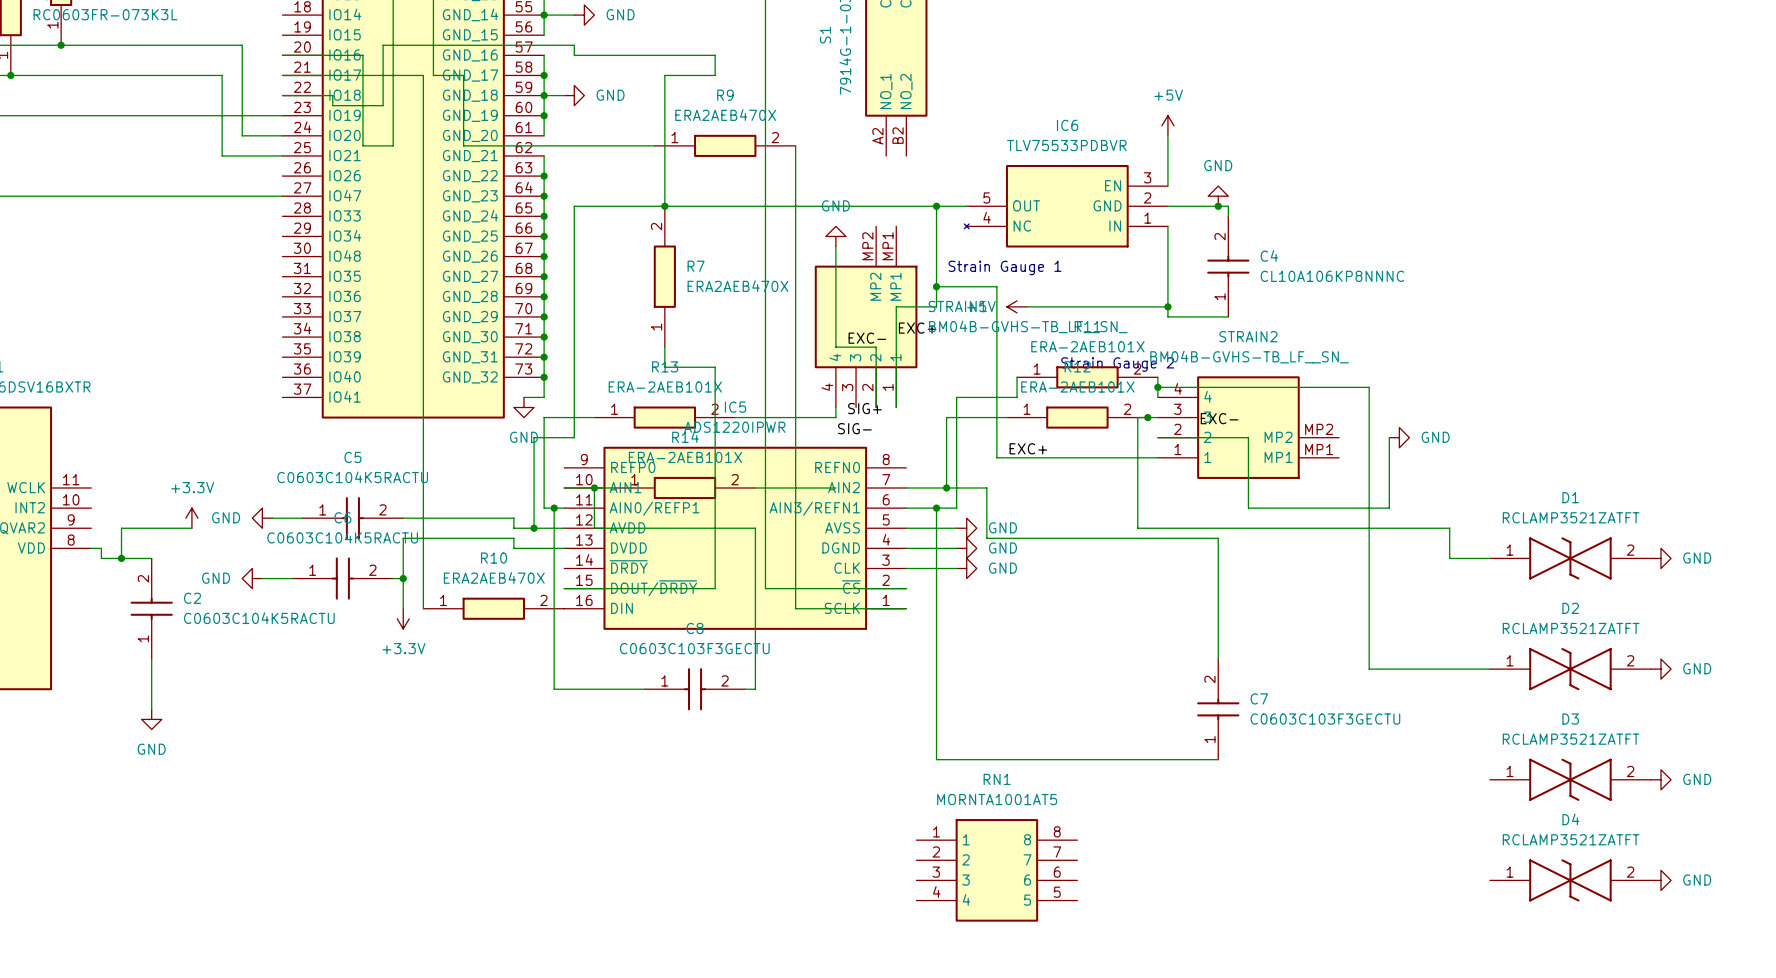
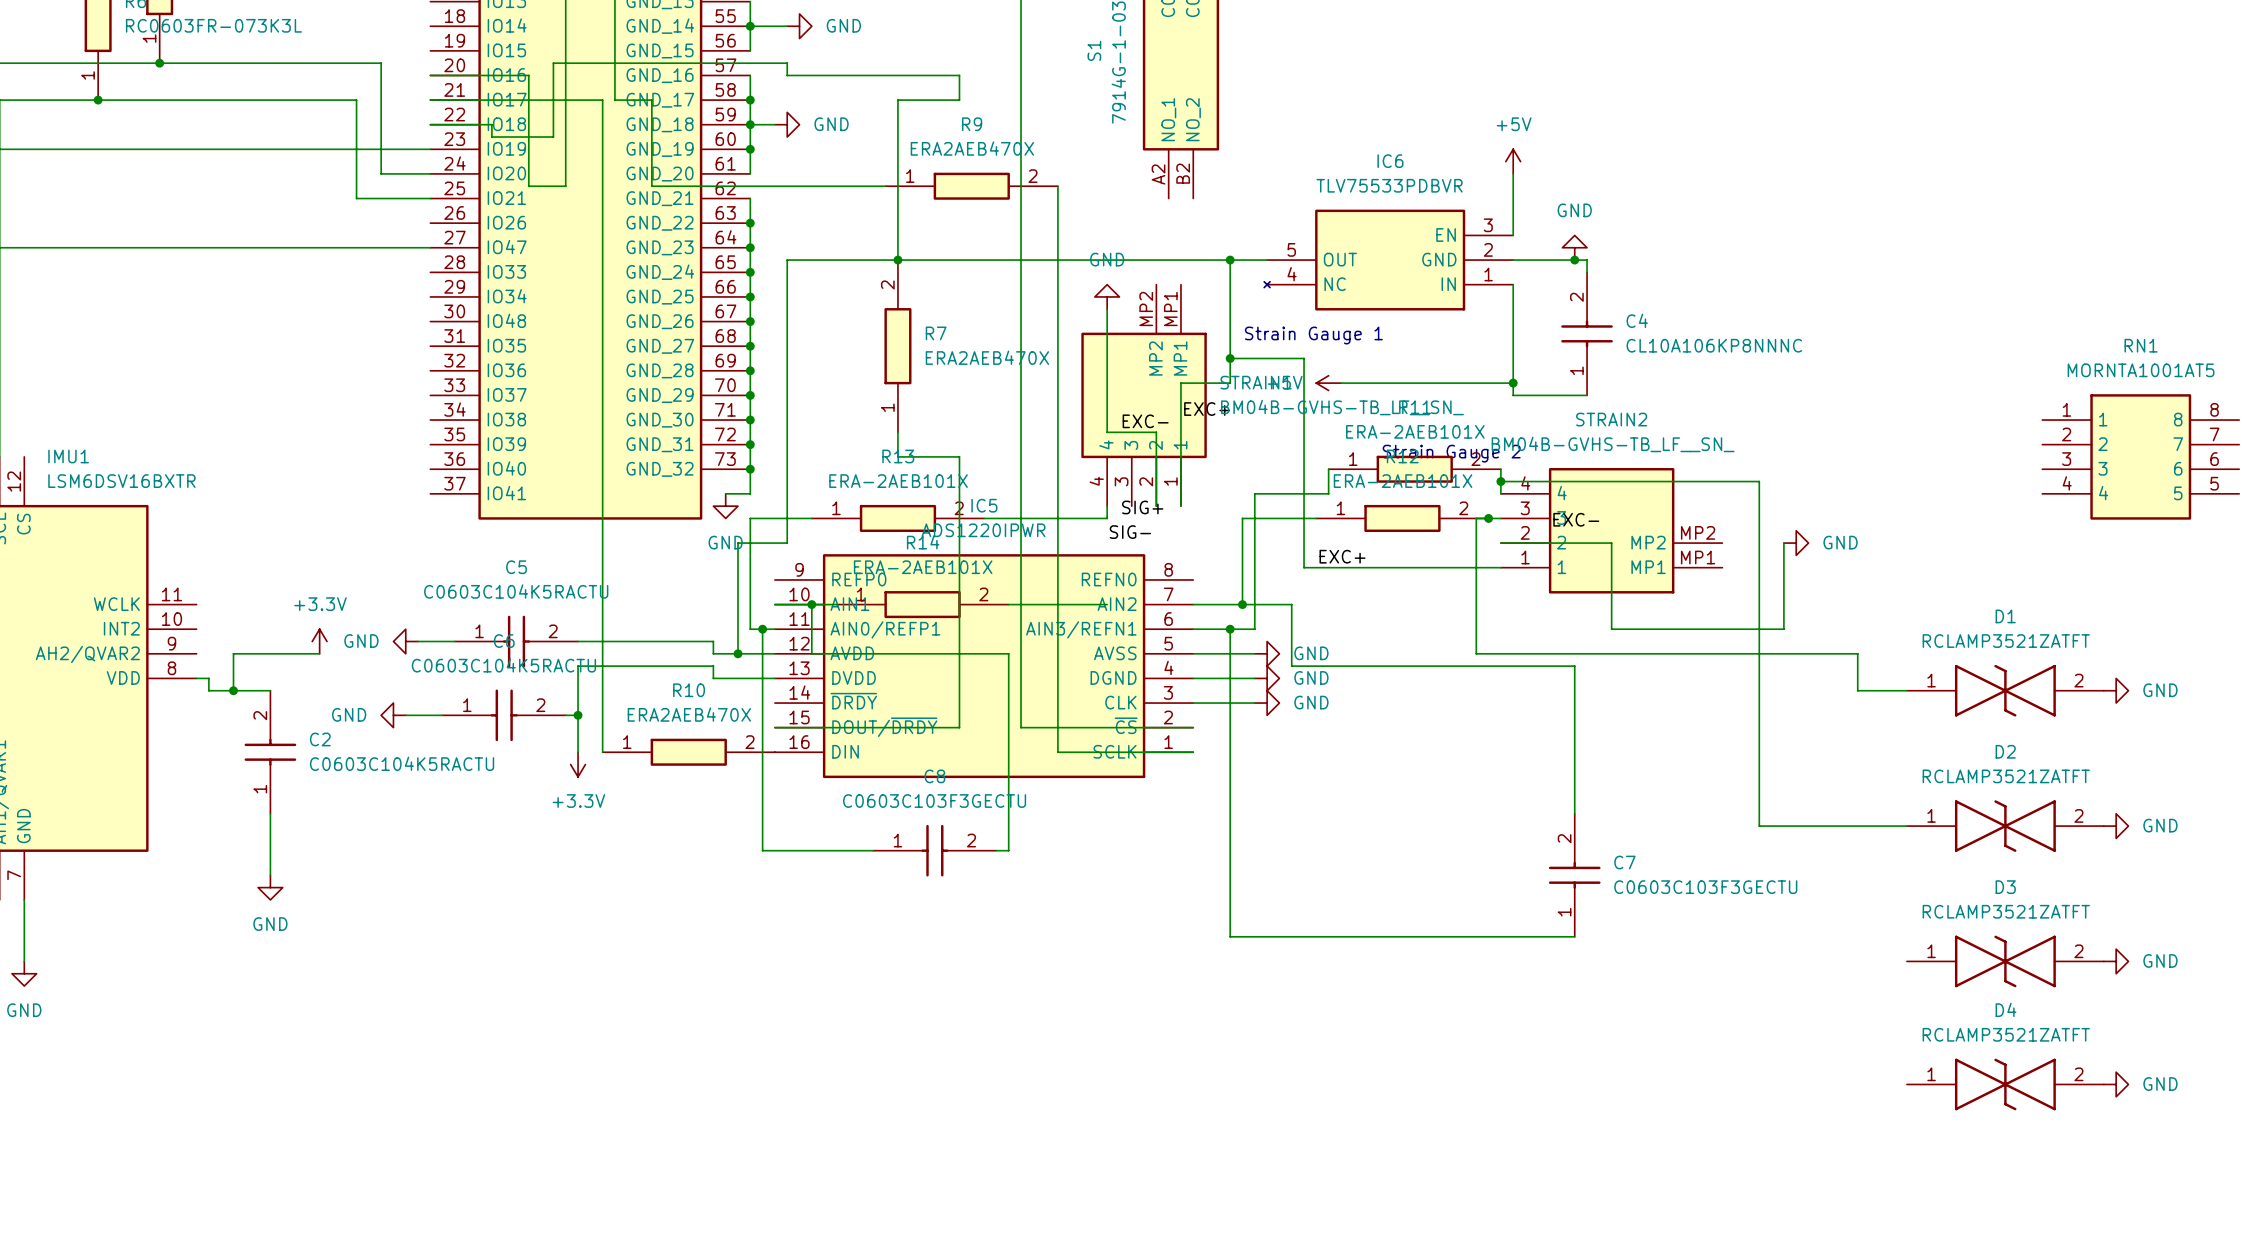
RN1 position: (996, 870) -> (2140, 456)

